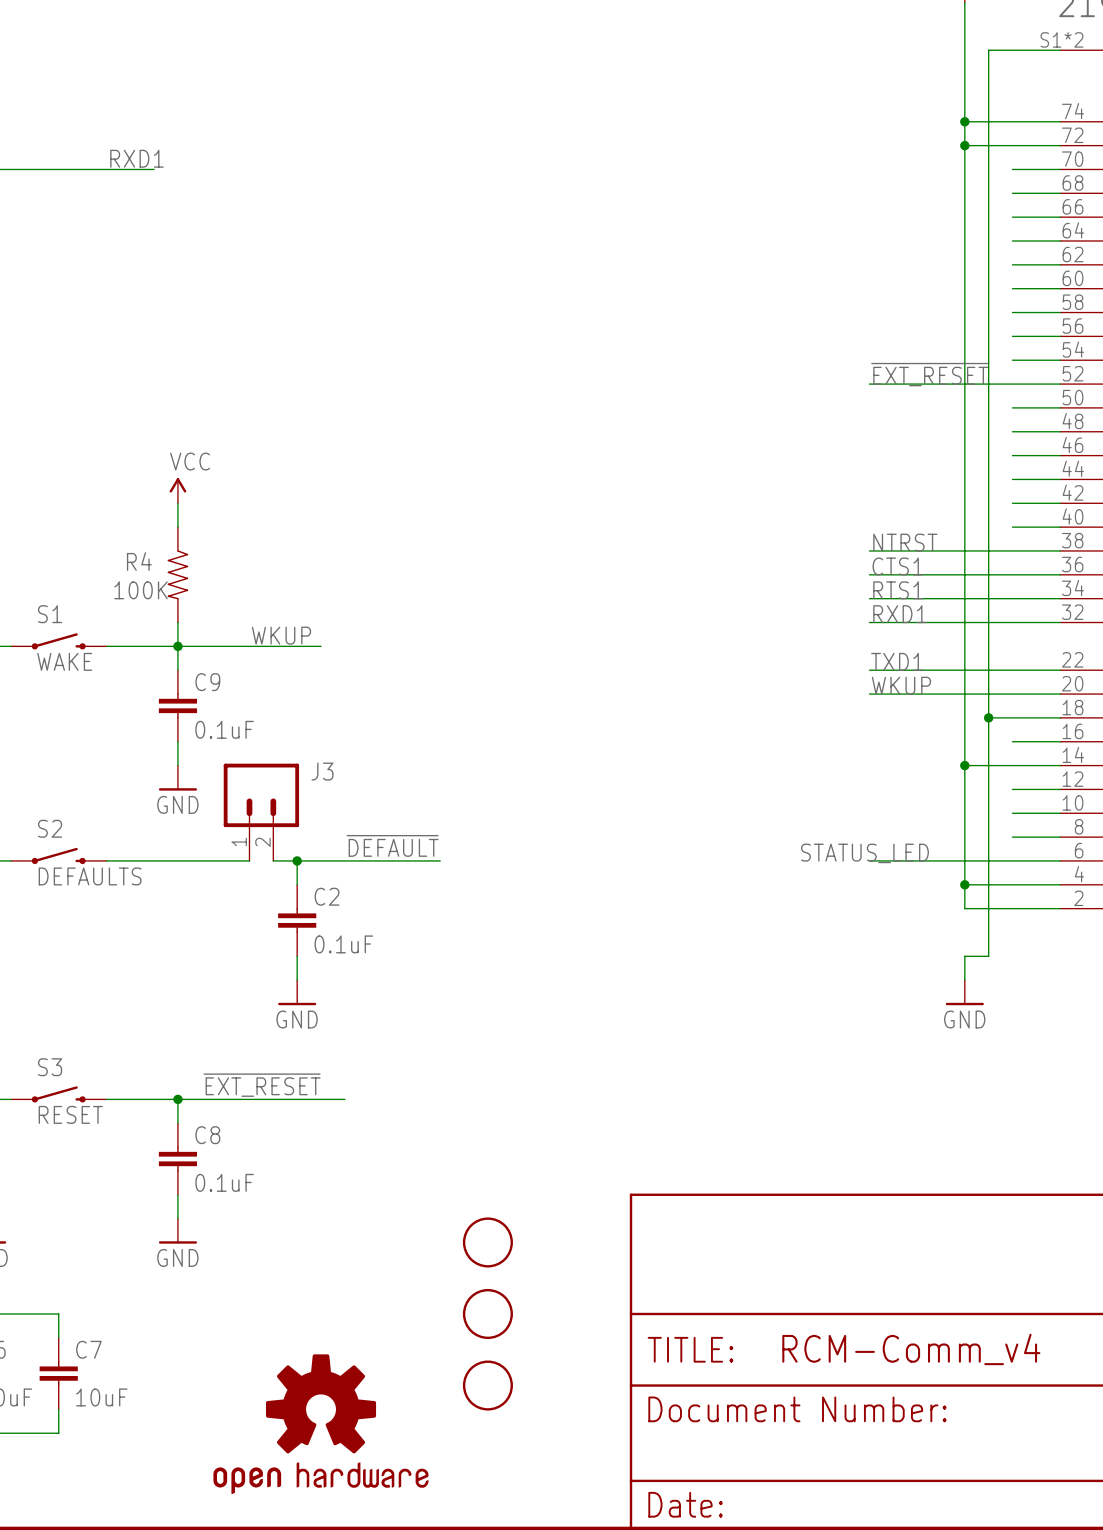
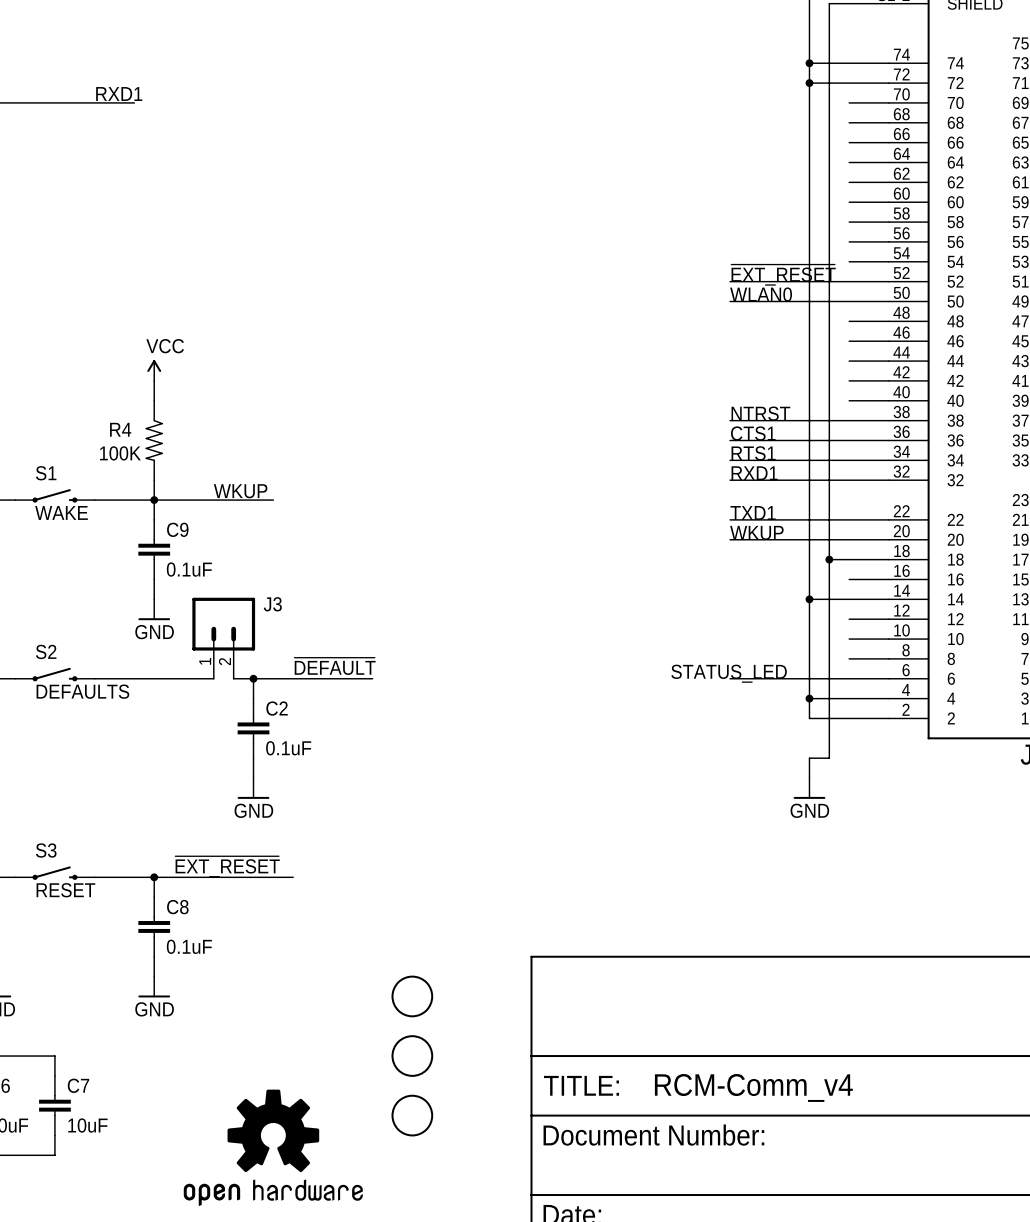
label: none -> WLAN0 (761, 294)
wire: none -> (730, 301) (849, 301)

